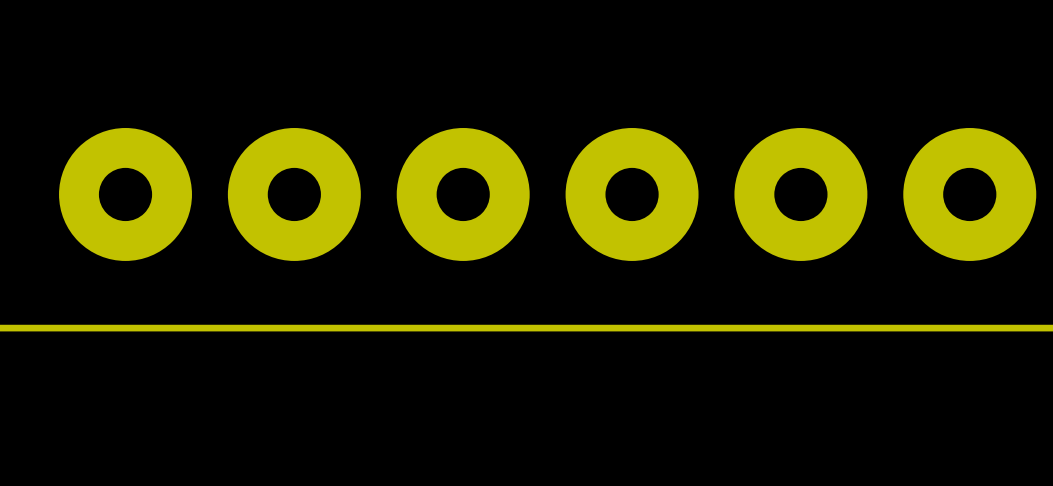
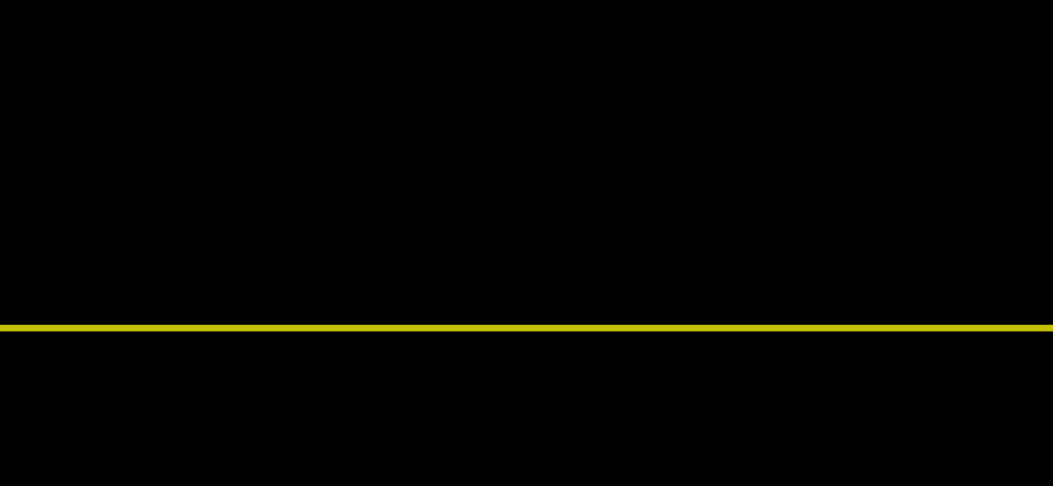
part: (547, 194) -> none

